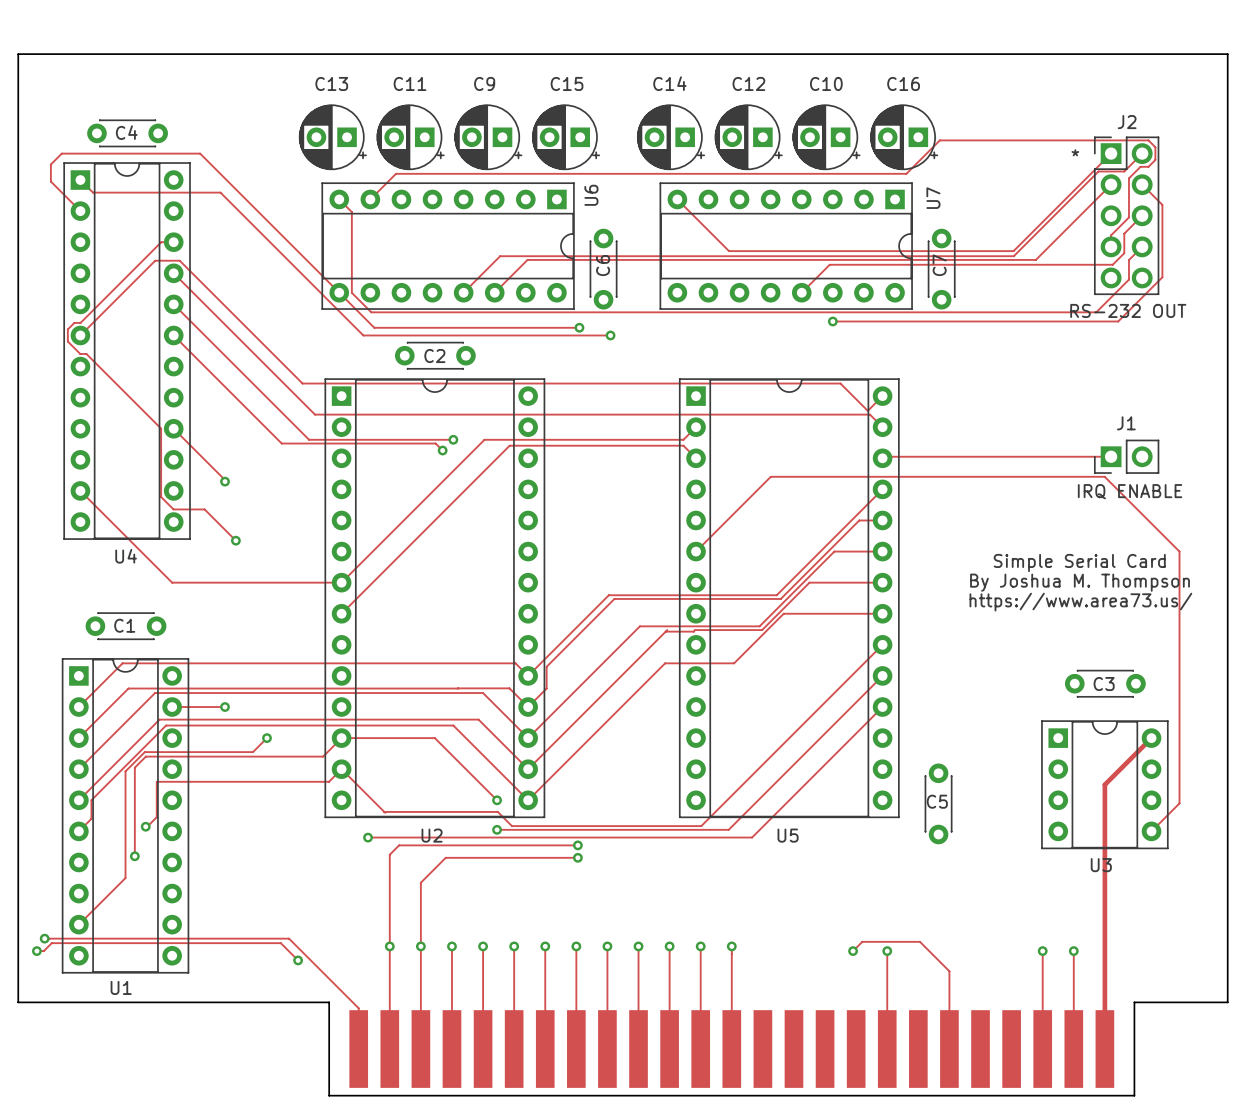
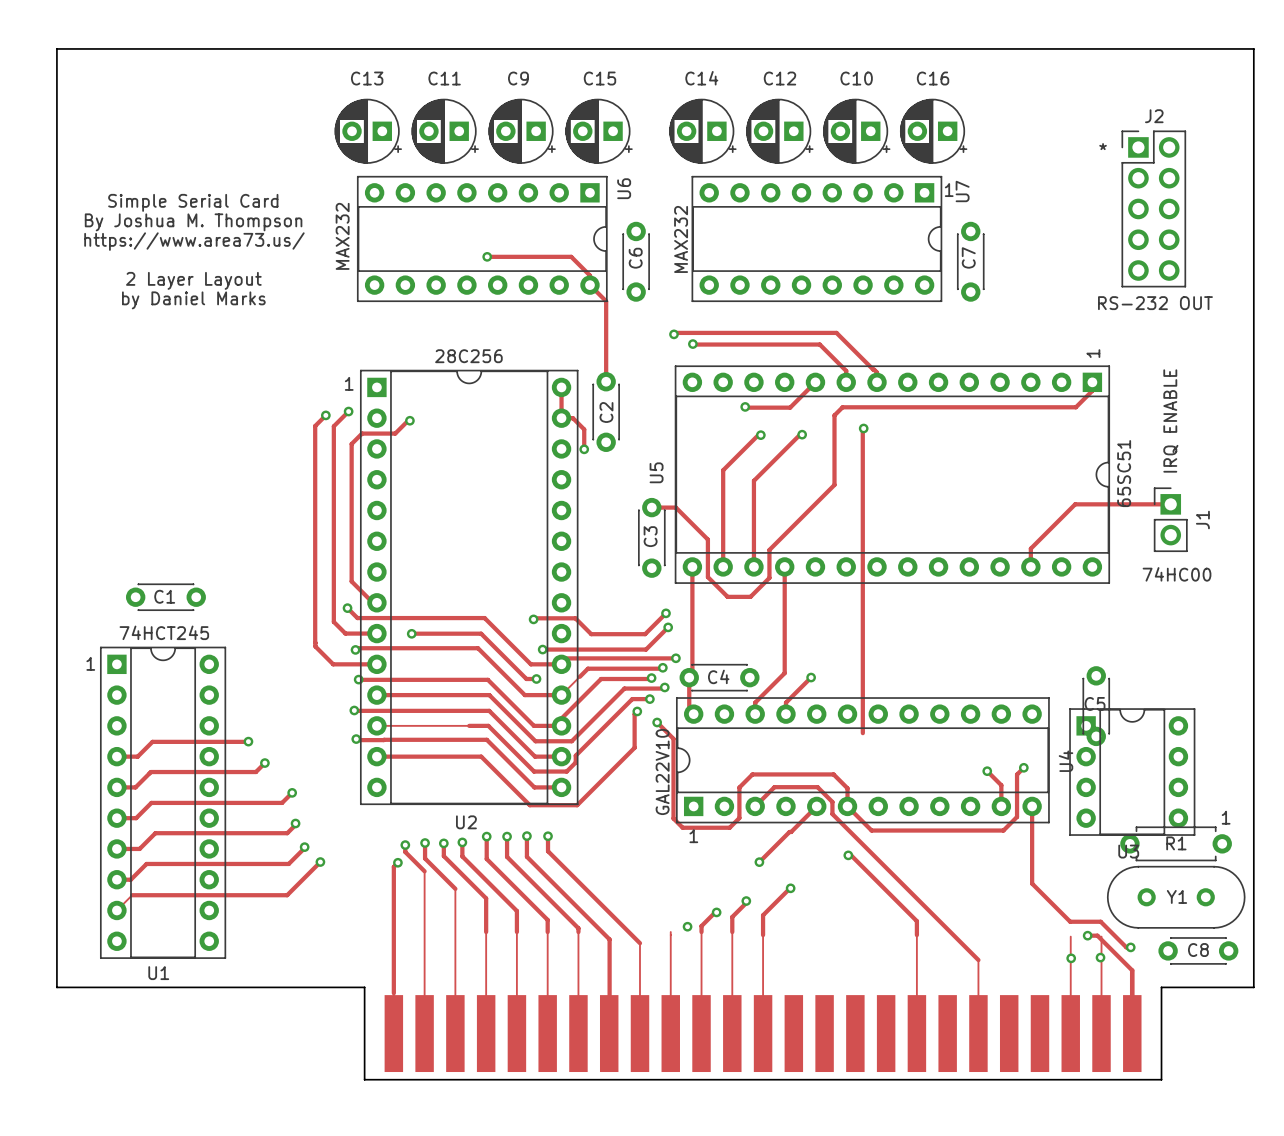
C4 position: (127, 133) -> (719, 677)
track: (1111, 153) (1013, 251) (729, 251) (677, 199) -> none
track: (1142, 153) (1124, 171) (1098, 171) (1013, 256) (500, 256) (463, 292) -> none
track: (80, 180) (93, 192) (220, 192) (363, 335) (610, 335) -> none
track: (1111, 184) (1035, 259) (527, 259) (494, 292) -> none
track: (1142, 184) (1162, 204) (1162, 277) (1118, 321) (832, 321) -> none
text: none -> 1 (949, 190)
track: (339, 199) (351, 212) (351, 292) (371, 312) (1096, 312) (1128, 279) (1128, 260) (1142, 246) -> none
track: (370, 199) (396, 173) (906, 173) (939, 140) (1148, 140) (1155, 147) (1155, 159) (1148, 166) (1140, 166) (1128, 178) (1128, 217) (1111, 235) (1111, 246) -> none
text: none -> Simple Serial Card (193, 202)
track: (80, 211) (50, 181) (50, 164) (61, 153) (200, 153) (374, 327) (579, 327) -> none
track: (1142, 215) (1124, 233) (1124, 253) (1112, 264) (829, 264) (801, 292) -> none
text: none -> By Joshua M. Thompson (193, 222)
track: (173, 242) (161, 242) (80, 322) (74, 322) (67, 329) (67, 341) (80, 353) (86, 353) (161, 428) (161, 496) (173, 509) (204, 509) (235, 540) -> none
text: none -> MAX232 (342, 236)
text: none -> MAX232 (681, 239)
text: none -> https://www.area73.us/ (194, 241)
track: none -> (487, 256) (571, 256) (589, 275) (589, 285) (606, 301) (606, 381)
via: none -> (487, 256)
track: (173, 273) (315, 414) (870, 414) (882, 427) -> none
text: none -> 2 Layer Layout (193, 280)
track: (173, 304) (309, 439) (453, 439) -> none
text: none -> by Daniel Marks (193, 300)
via: (832, 321) -> none
via: (579, 327) -> none
track: (80, 335) (155, 260) (179, 260) (302, 383) (840, 383) (867, 410) (882, 396) -> none
track: (173, 335) (281, 443) (435, 443) (442, 450) -> none
via: (610, 335) -> none
track: none -> (673, 334) (836, 332) (877, 372) (877, 382)
via: none -> (673, 334)
U4 rotation: 0° (127, 351) -> 90° counterclockwise (862, 760)
U4 position: (127, 351) -> (862, 760)
track: none -> (692, 344) (819, 344) (846, 370) (846, 382)
via: none -> (692, 344)
C2 rotation: 0° (435, 355) -> 90° clockwise (606, 412)
C2 position: (435, 355) -> (606, 412)
text: none -> 1 (1093, 353)
text: none -> 28C256 (468, 356)
track: none -> (815, 382) (790, 407) (745, 406)
track: none -> (1092, 382) (1092, 390) (1075, 407) (842, 407) (834, 415) (834, 484) (769, 549) (769, 577) (750, 596) (727, 596) (707, 577) (707, 539) (675, 507) (651, 507)
text: none -> 1 (349, 383)
track: none -> (561, 387) (561, 418) (572, 418) (584, 429) (584, 449)
via: none -> (745, 406)
track: none -> (348, 411) (333, 426) (333, 621) (345, 633) (376, 633)
via: none -> (348, 411)
track: none -> (325, 415) (315, 426) (315, 646) (333, 664) (376, 664)
via: none -> (325, 415)
track: (696, 427) (683, 439) (484, 439) (341, 582) (172, 582) (80, 490) -> none
track: (173, 428) (225, 481) -> none
via: none -> (409, 420)
via: none -> (863, 428)
track: none -> (862, 429) (862, 733)
via: (453, 439) -> none
track: none -> (802, 434) (753, 480) (753, 566)
via: none -> (802, 434)
track: none -> (760, 435) (758, 435) (723, 470) (723, 566)
via: none -> (760, 435)
via: (442, 450) -> none
track: (1111, 456) (884, 456) (882, 458) -> none
J1 rotation: 0° (1126, 456) -> 90° clockwise (1170, 519)
J1 position: (1126, 456) -> (1170, 519)
via: none -> (584, 449)
track: (696, 458) (683, 445) (509, 445) (341, 613) -> (409, 420) (395, 433) (362, 433) (351, 443) (351, 581) (372, 602) (376, 602)
via: (225, 481) -> none
text: none -> 65SC51 (1124, 473)
track: (882, 489) (776, 595) (608, 595) (534, 669) -> (675, 658) (567, 658)
J1 value position: IRQ ENABLE (1130, 491) -> IRQ ENABLE (1170, 420)
track: none -> (1170, 504) (1075, 504) (1030, 548) (1030, 566)
track: (882, 520) (859, 520) (780, 598) (614, 598) (546, 666) (546, 688) -> (662, 667) (587, 668) (579, 676)
via: (235, 540) -> none
track: (696, 551) (770, 476) (1104, 476) (1179, 551) (1179, 803) (1151, 831) -> none
track: (882, 551) (834, 551) (759, 626) (639, 626) (528, 738) (483, 693) (155, 693) (78, 769) -> (248, 741) (152, 741) (137, 756) (116, 756)
text: Simple Serial Card (1079, 562) -> none
track: none -> (692, 566) (692, 674) (689, 677) (689, 709) (693, 714)
track: none -> (784, 566) (784, 673) (755, 702) (755, 714)
track: (882, 582) (809, 582) (762, 630) (665, 631) -> none
text: By Joshua M. Thompson (1080, 582) -> none
text: none -> 74HC00 (1177, 574)
U5 rotation: 0° (789, 598) -> 90° clockwise (892, 474)
text: https://www.area73.us/ (1080, 602) -> none
track: (882, 613) (783, 613) (734, 663) (665, 663) (528, 800) (453, 725) (166, 725) (91, 800) (91, 818) (78, 831) -> (292, 792) (282, 802) (151, 802) (136, 818) (116, 818)
via: none -> (347, 608)
track: none -> (666, 613) (645, 634) (591, 634) (575, 618) (533, 619)
via: none -> (666, 613)
C1 position: (126, 626) -> (165, 597)
via: none -> (533, 619)
track: (667, 630) (528, 769) (478, 719) (159, 719) (78, 800) -> (264, 763) (255, 772) (150, 772) (135, 787) (116, 787)
track: none -> (668, 627) (646, 649) (542, 649)
via: none -> (668, 627)
text: none -> 74HCT245 (164, 632)
track: none -> (411, 633) (481, 633) (526, 678) (536, 678)
track: (882, 644) (701, 826) (511, 826) (497, 811) (384, 811) -> none
via: none -> (411, 633)
via: none -> (355, 649)
via: none -> (542, 649)
via: none -> (675, 658)
text: none -> 1 (90, 663)
track: (528, 675) (515, 663) (122, 663) (78, 707) -> (561, 664) (530, 664) (484, 618) (357, 618) (347, 608)
track: (882, 675) (728, 829) (497, 829) -> none
via: none -> (662, 667)
C3 rotation: 0° (1105, 683) -> 90° clockwise (651, 537)
C3 position: (1105, 683) -> (651, 537)
track: (458, 688) (509, 688) (528, 707) -> (355, 649) (357, 648) (477, 648) (524, 695) (561, 695)
track: (458, 688) (128, 688) (78, 738) -> none
track: none -> (651, 678) (601, 678) (561, 718) (561, 725) (533, 725) (487, 679) (358, 679)
via: none -> (651, 678)
track: none -> (811, 677) (785, 702) (785, 714)
via: none -> (811, 677)
via: none -> (536, 678)
via: none -> (358, 679)
track: none -> (664, 687) (624, 688) (571, 741) (535, 741) (489, 695) (376, 695)
via: none -> (664, 687)
track: (172, 707) (225, 707) -> none
via: (225, 707) -> none
track: (882, 707) (752, 837) (368, 837) -> none
via: none -> (649, 699)
track: none -> (354, 710) (489, 710) (535, 756) (561, 756)
via: none -> (354, 710)
track: none -> (637, 711) (634, 714) (634, 747) (577, 805) (529, 805) (481, 756) (376, 756)
via: none -> (637, 711)
track: none -> (657, 722) (673, 738) (673, 818) (682, 827) (729, 827) (739, 818) (739, 787) (752, 774) (833, 774) (847, 788) (847, 806) (871, 830) (1003, 830) (1017, 816) (1017, 774) (1023, 767)
via: none -> (657, 722)
track: (266, 738) (252, 752) (144, 752) (125, 771) (125, 878) (94, 909) -> (320, 862) (287, 895) (132, 895)
via: (266, 738) -> none
track: (341, 738) (323, 756) (145, 756) (134, 767) (134, 856) -> none
track: (434, 738) (497, 800) -> (469, 725) (488, 725) (534, 771) (566, 771) (575, 762) (575, 755) (632, 699) (649, 699)
track: (1151, 738) (1104, 784) (1104, 985) -> (1087, 935) (1097, 935) (1132, 970)
track: none -> (356, 739) (486, 739) (534, 787) (561, 787)
via: none -> (356, 739)
via: none -> (248, 741)
via: none -> (264, 763)
via: none -> (1023, 767)
track: none -> (987, 771) (1001, 785) (1001, 806)
via: none -> (987, 771)
text: none -> GAL22V10 (662, 772)
via: (497, 800) -> none
C5 position: (938, 803) -> (1096, 706)
via: none -> (292, 792)
track: (385, 812) (341, 769) (329, 781) (156, 781) (156, 817) (145, 826) -> none
track: none -> (816, 806) (759, 862)
track: none -> (1032, 806) (1032, 883) (1070, 921) (1100, 921) (1126, 947) (1130, 947)
via: (145, 826) -> none
via: (497, 829) -> none
text: none -> 1 (1226, 817)
track: none -> (295, 823) (287, 833) (155, 833) (139, 848) (116, 848)
via: none -> (295, 823)
via: (368, 837) -> none
track: (577, 845) (399, 845) (389, 854) (389, 885) -> (405, 845) (405, 852) (424, 871)
via: (577, 845) -> none
track: none -> (486, 836) (486, 859) (547, 919) (547, 932)
via: none -> (486, 836)
track: none -> (507, 836) (507, 856) (578, 928) (578, 932)
via: none -> (507, 836)
via: none -> (526, 836)
via: none -> (548, 836)
text: none -> 1 (693, 836)
track: none -> (462, 842) (462, 856) (516, 911) (516, 932)
via: none -> (462, 842)
via: (134, 856) -> none
via: none -> (425, 843)
track: none -> (443, 843) (443, 856) (486, 898) (486, 932)
via: none -> (443, 843)
track: (577, 857) (445, 857) (420, 882) (420, 902) -> (425, 843) (425, 858) (455, 888)
via: (577, 857) -> none
R1: none -> (1176, 843)
via: none -> (405, 845)
track: none -> (304, 847) (288, 863) (146, 863) (130, 879) (116, 879)
via: none -> (304, 847)
track: none -> (848, 855) (851, 855) (916, 921) (916, 935)
via: none -> (848, 855)
via: none -> (320, 862)
via: none -> (759, 862)
via: none -> (397, 862)
track: none -> (790, 888) (763, 915) (763, 935)
via: none -> (790, 888)
Y1: none -> (1176, 897)
track: none -> (746, 901) (732, 916) (732, 932)
via: none -> (746, 901)
track: none -> (716, 912) (701, 926) (701, 932)
via: none -> (716, 912)
track: (44, 938) (289, 938) (358, 1008) -> (397, 862) (393, 866) (393, 993)
via: (44, 938) -> none
via: none -> (687, 926)
via: (389, 946) -> none
via: (420, 946) -> none
via: (451, 946) -> none
via: (483, 946) -> none
via: (514, 946) -> none
via: (545, 946) -> none
track: (576, 946) (576, 1049) -> (526, 836) (526, 856) (609, 939) (609, 1033)
via: (576, 946) -> none
track: (607, 946) (607, 957) -> (548, 836) (548, 851) (639, 943)
via: (607, 946) -> none
via: (638, 946) -> none
via: (669, 946) -> none
via: (700, 946) -> none
via: (731, 946) -> none
via: none -> (1087, 935)
track: (36, 951) (43, 951) (51, 943) (280, 943) (298, 960) -> none
via: (36, 951) -> none
track: (853, 951) (862, 941) (919, 941) (949, 971) (949, 974) -> (755, 806) (774, 787) (817, 787) (832, 801) (832, 814) (978, 960)
via: (853, 951) -> none
via: (887, 951) -> none
via: (1042, 951) -> none
via: (1073, 951) -> none
via: (298, 960) -> none
via: none -> (1130, 947)
C8: none -> (1198, 950)
via: none -> (1100, 957)
via: none -> (1071, 958)

